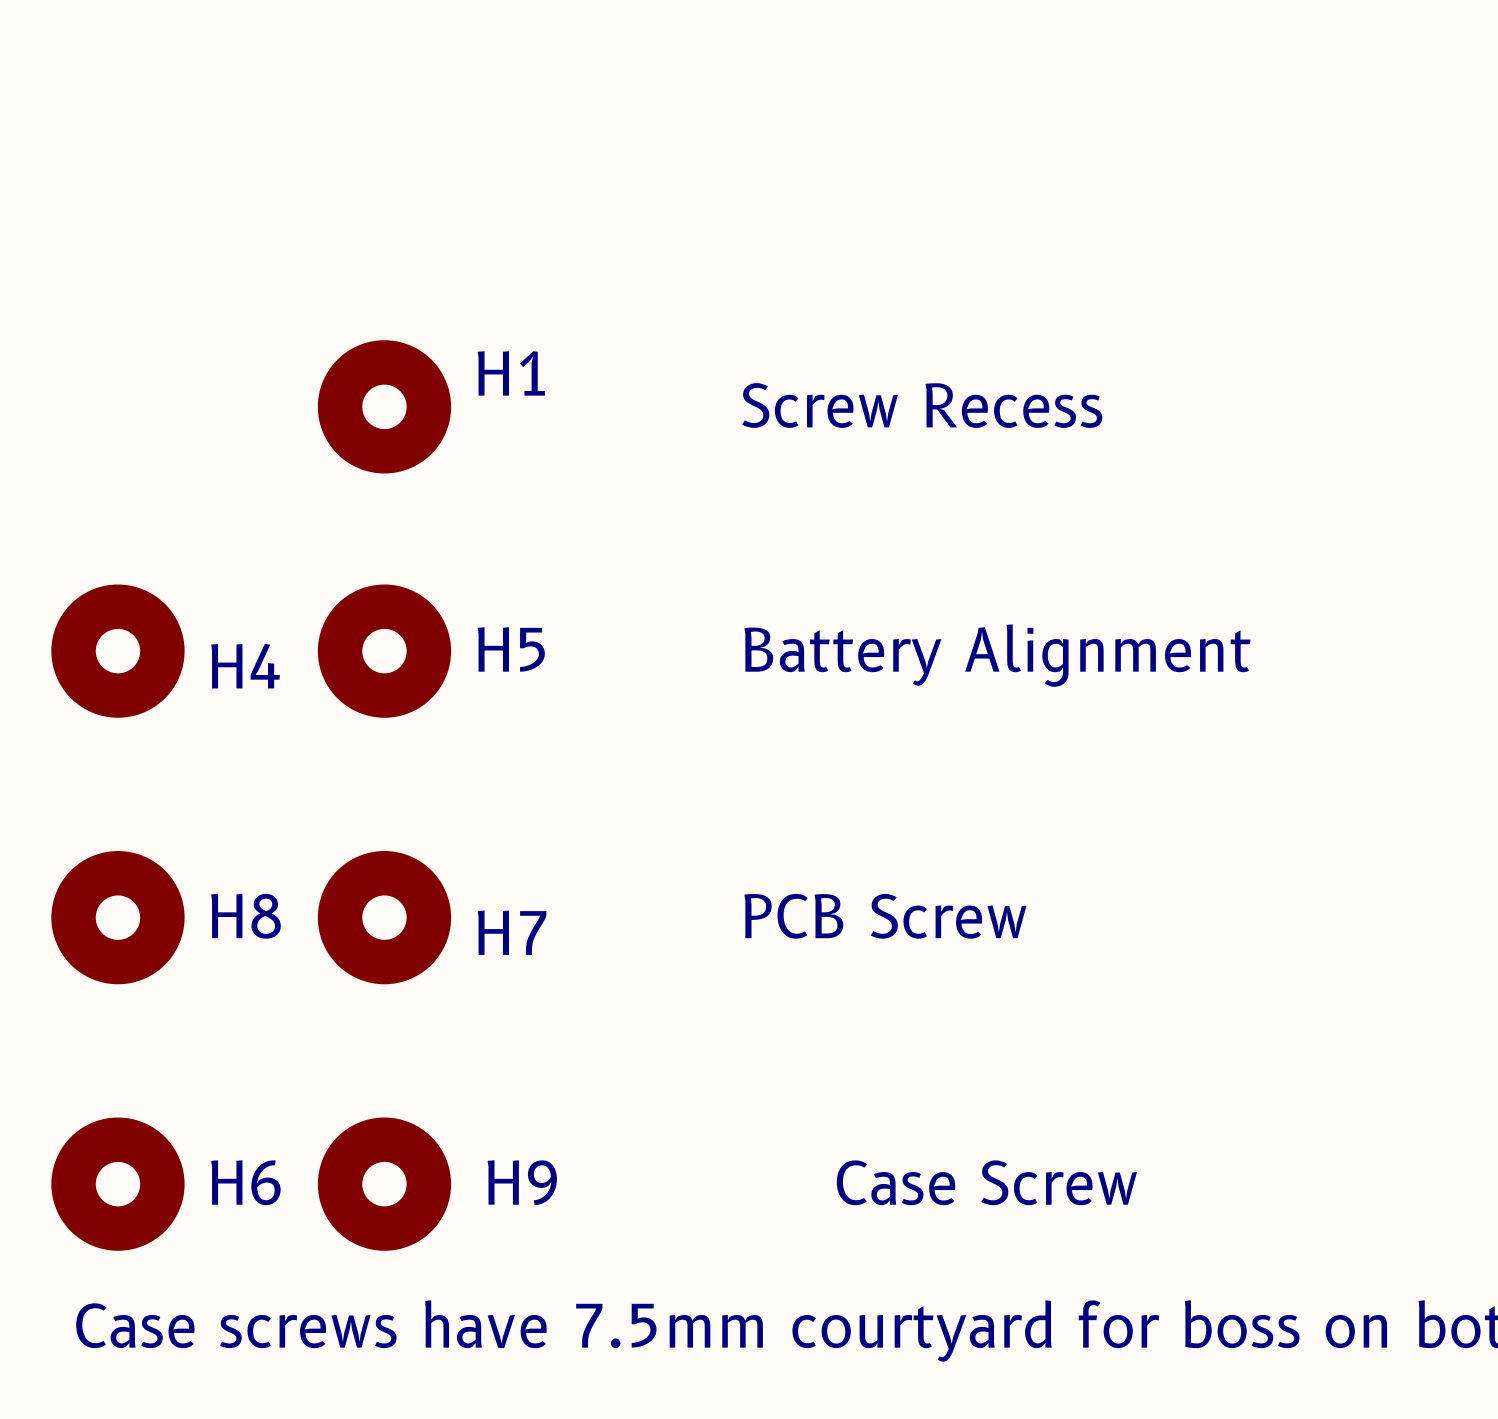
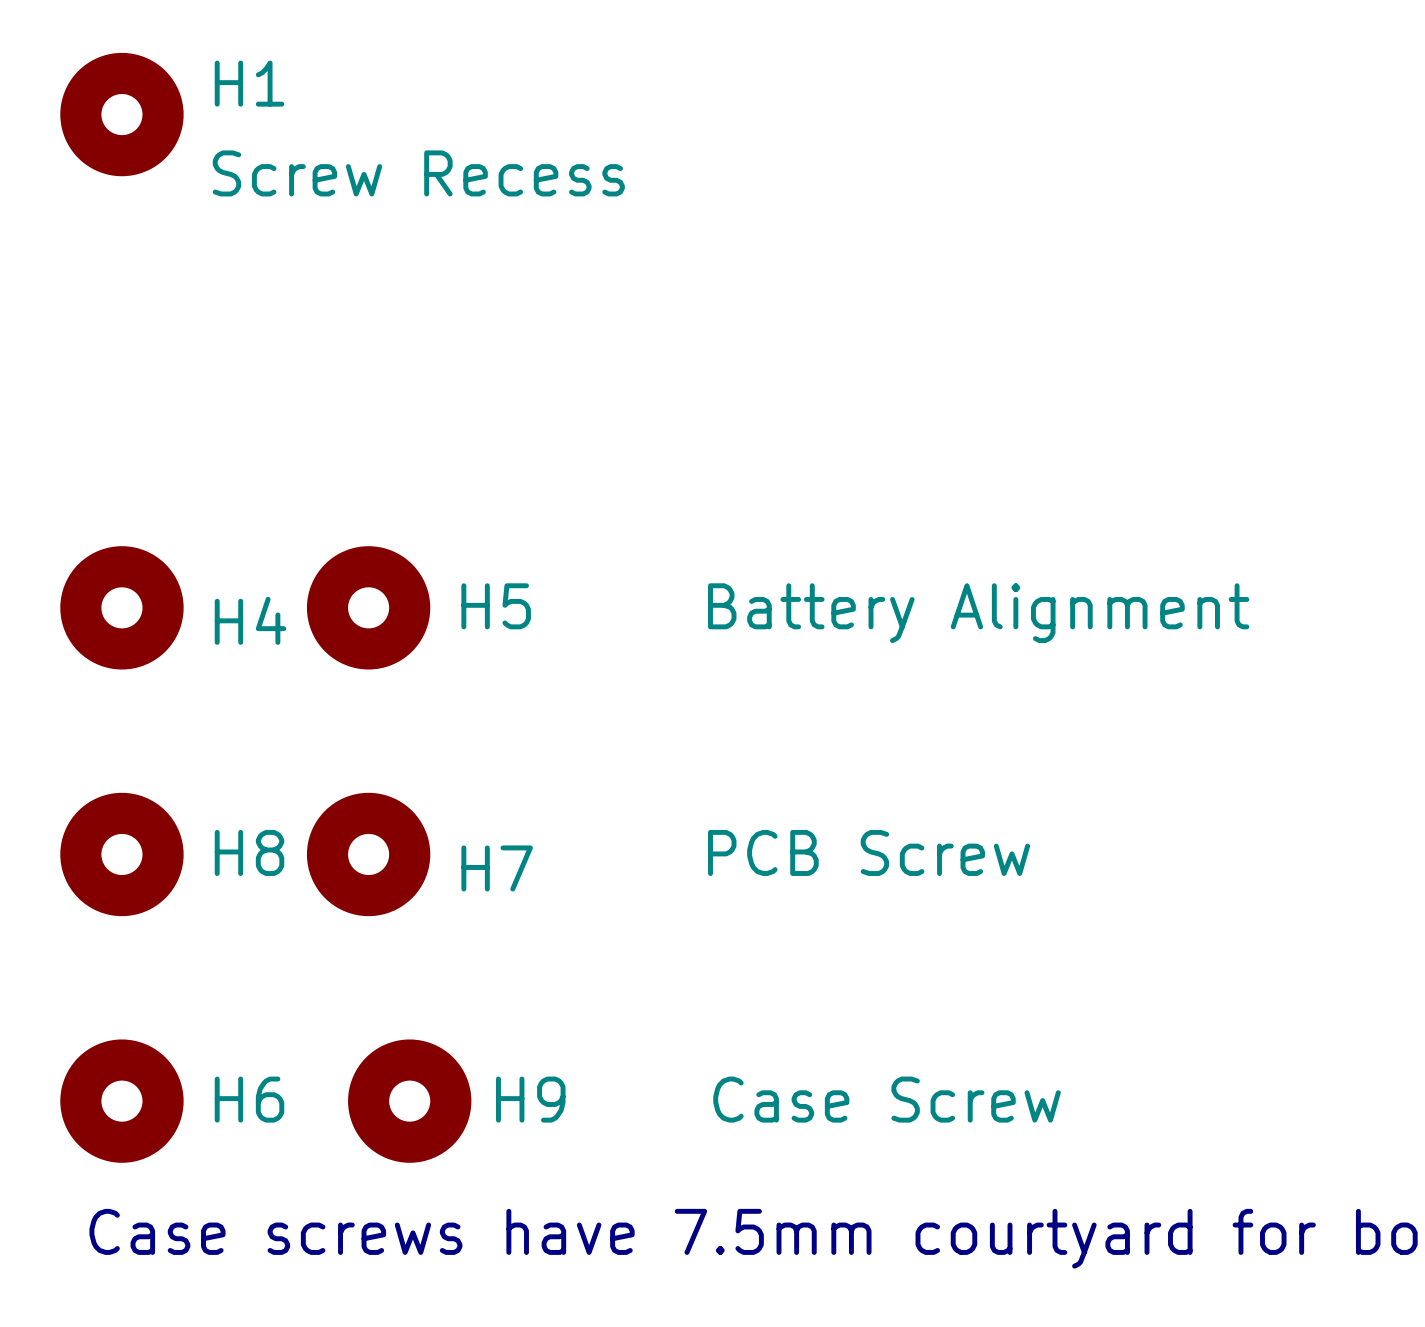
H1 value position: Screw Recess (922, 405) -> Screw Recess (418, 173)
H1 position: (384, 406) -> (121, 114)
H9 position: (384, 1184) -> (409, 1101)

